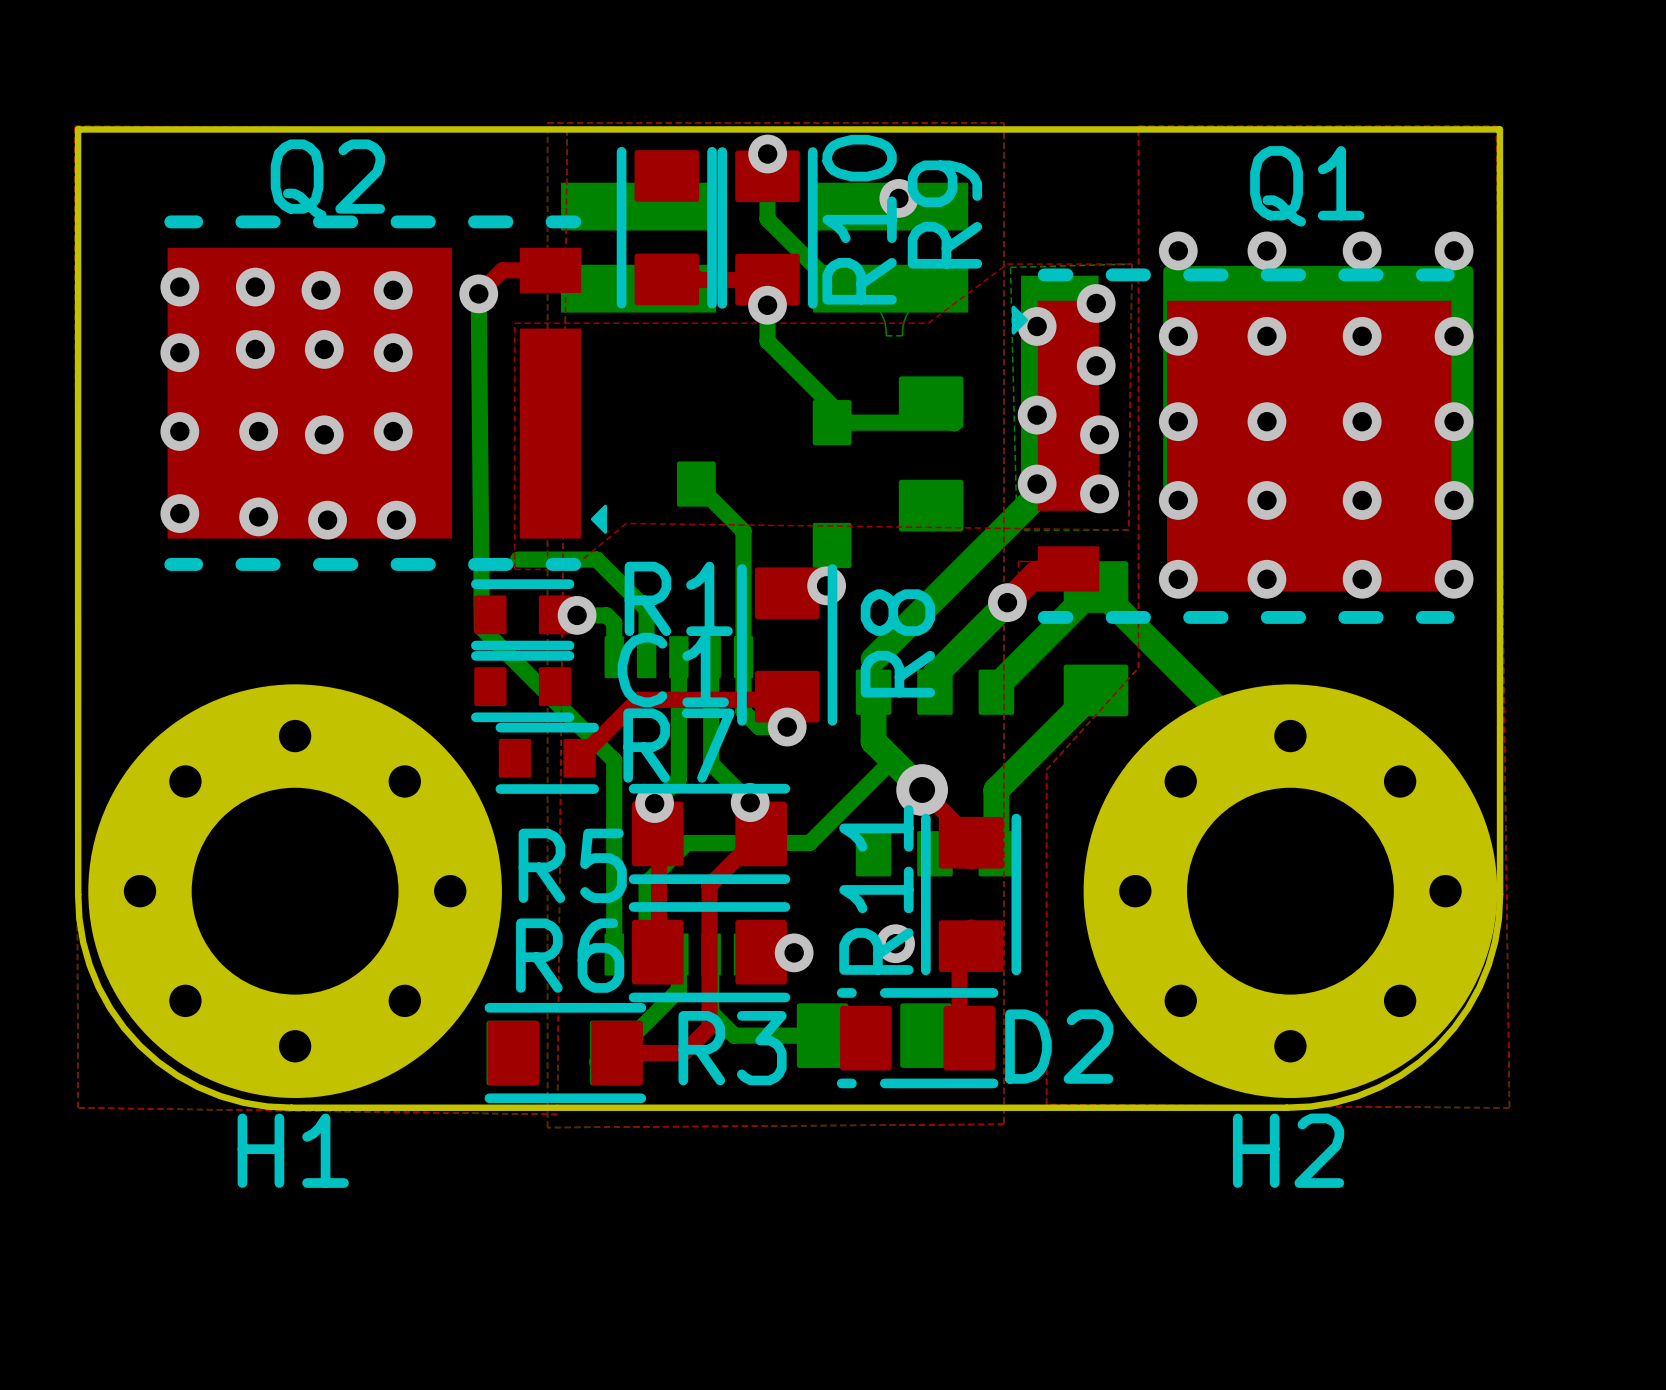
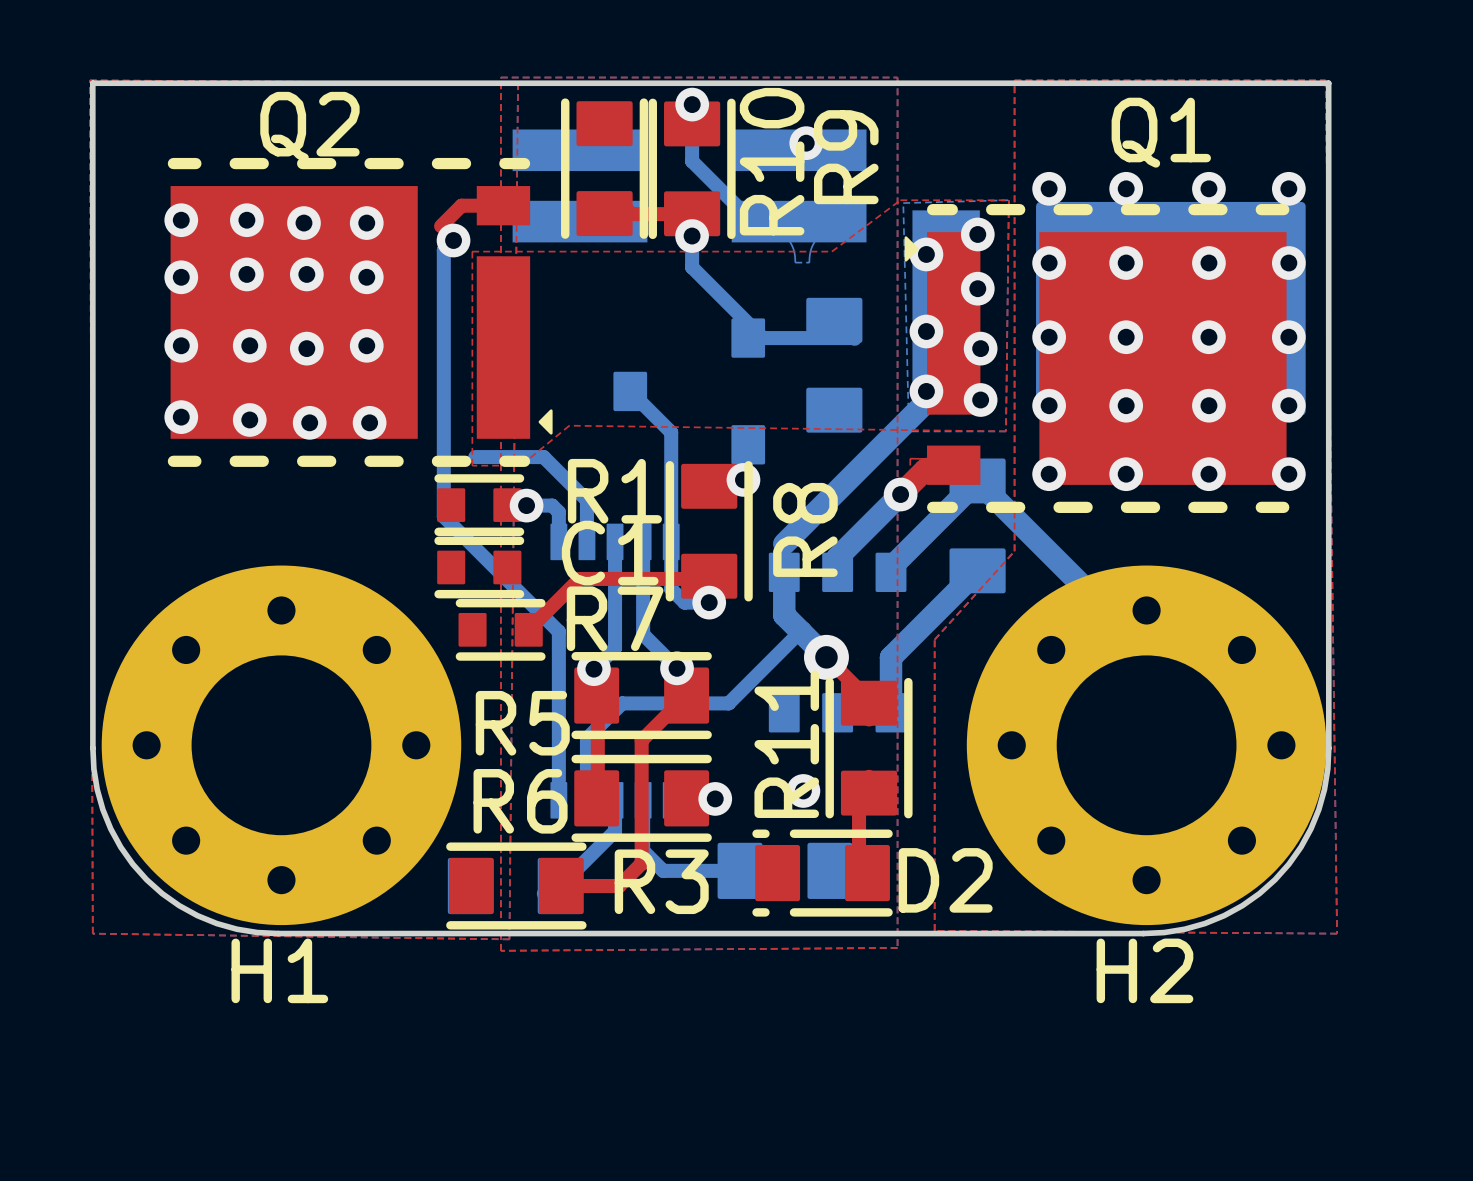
bottom track: (481, 290) (478, 293) (481, 628) -> (453, 232) (453, 240) (443, 250) (443, 516)
via position: (478, 293) -> (453, 240)

